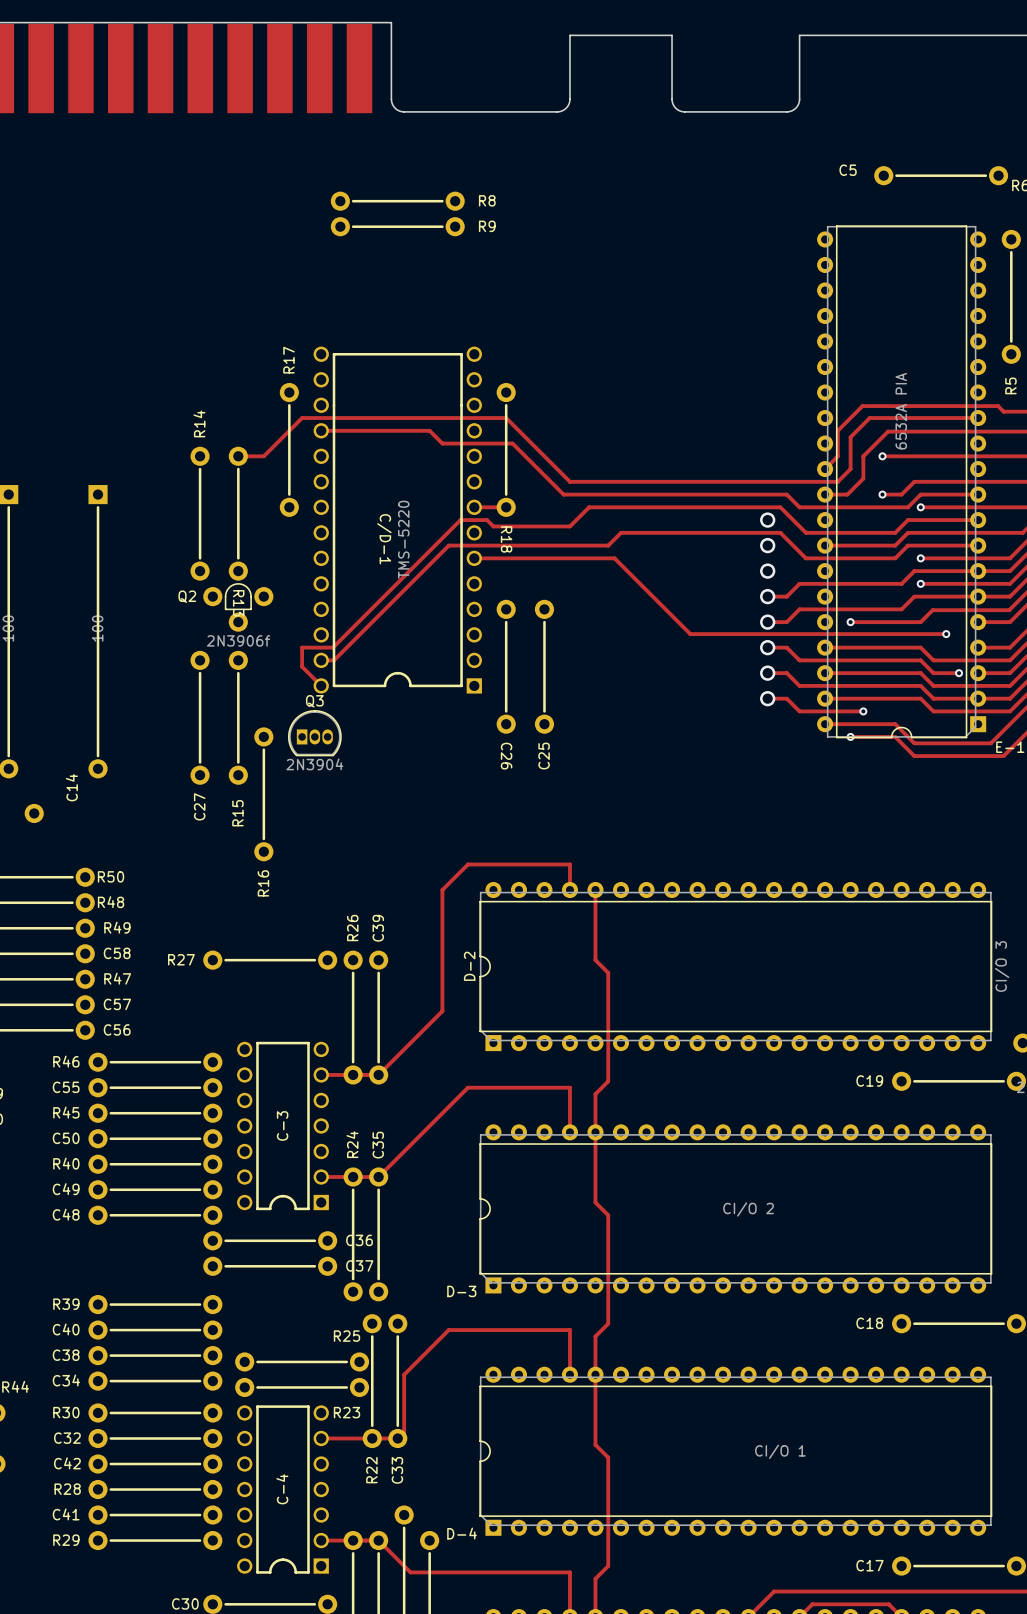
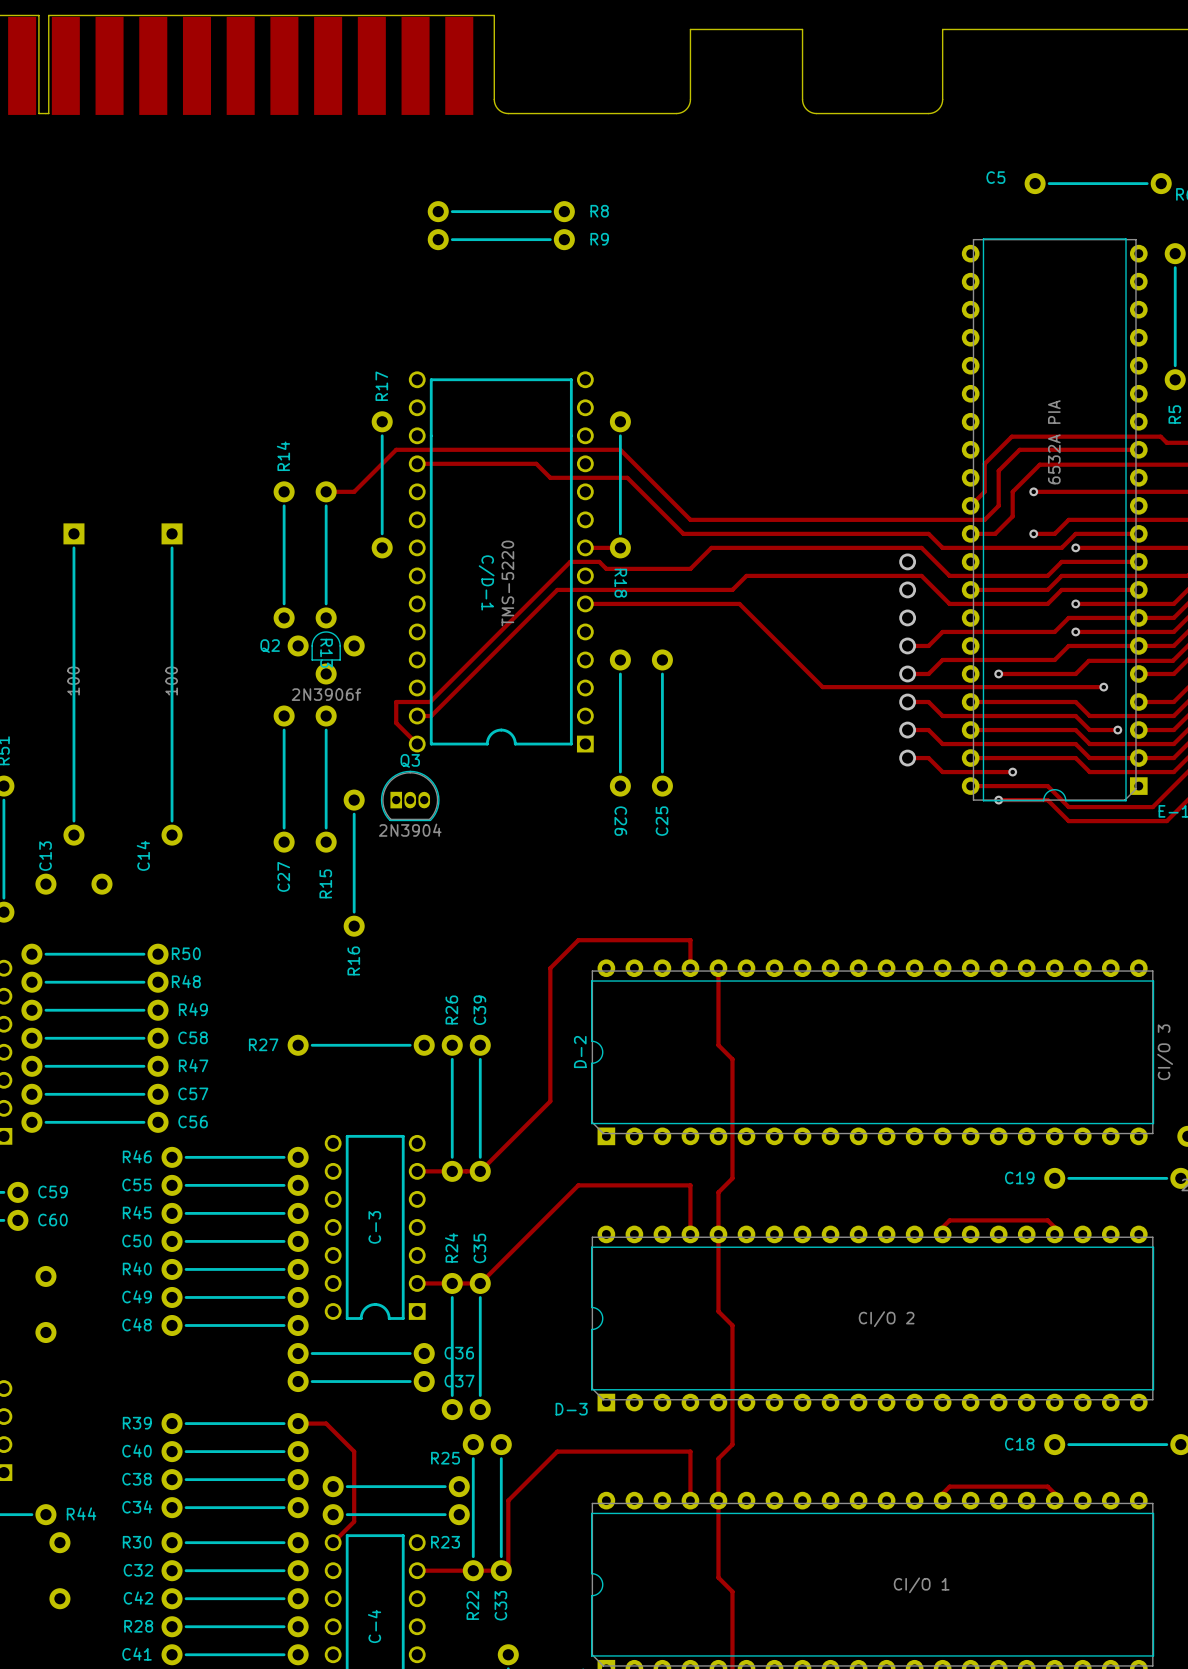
track: none -> (942, 1227) (949, 1220) (1047, 1220) (1054, 1227) (1054, 1234)
track: none -> (298, 1423) (326, 1423) (354, 1451) (354, 1521) (333, 1542)
track: none -> (942, 1500) (942, 1493) (949, 1486) (1047, 1486) (1054, 1493) (1054, 1500)

